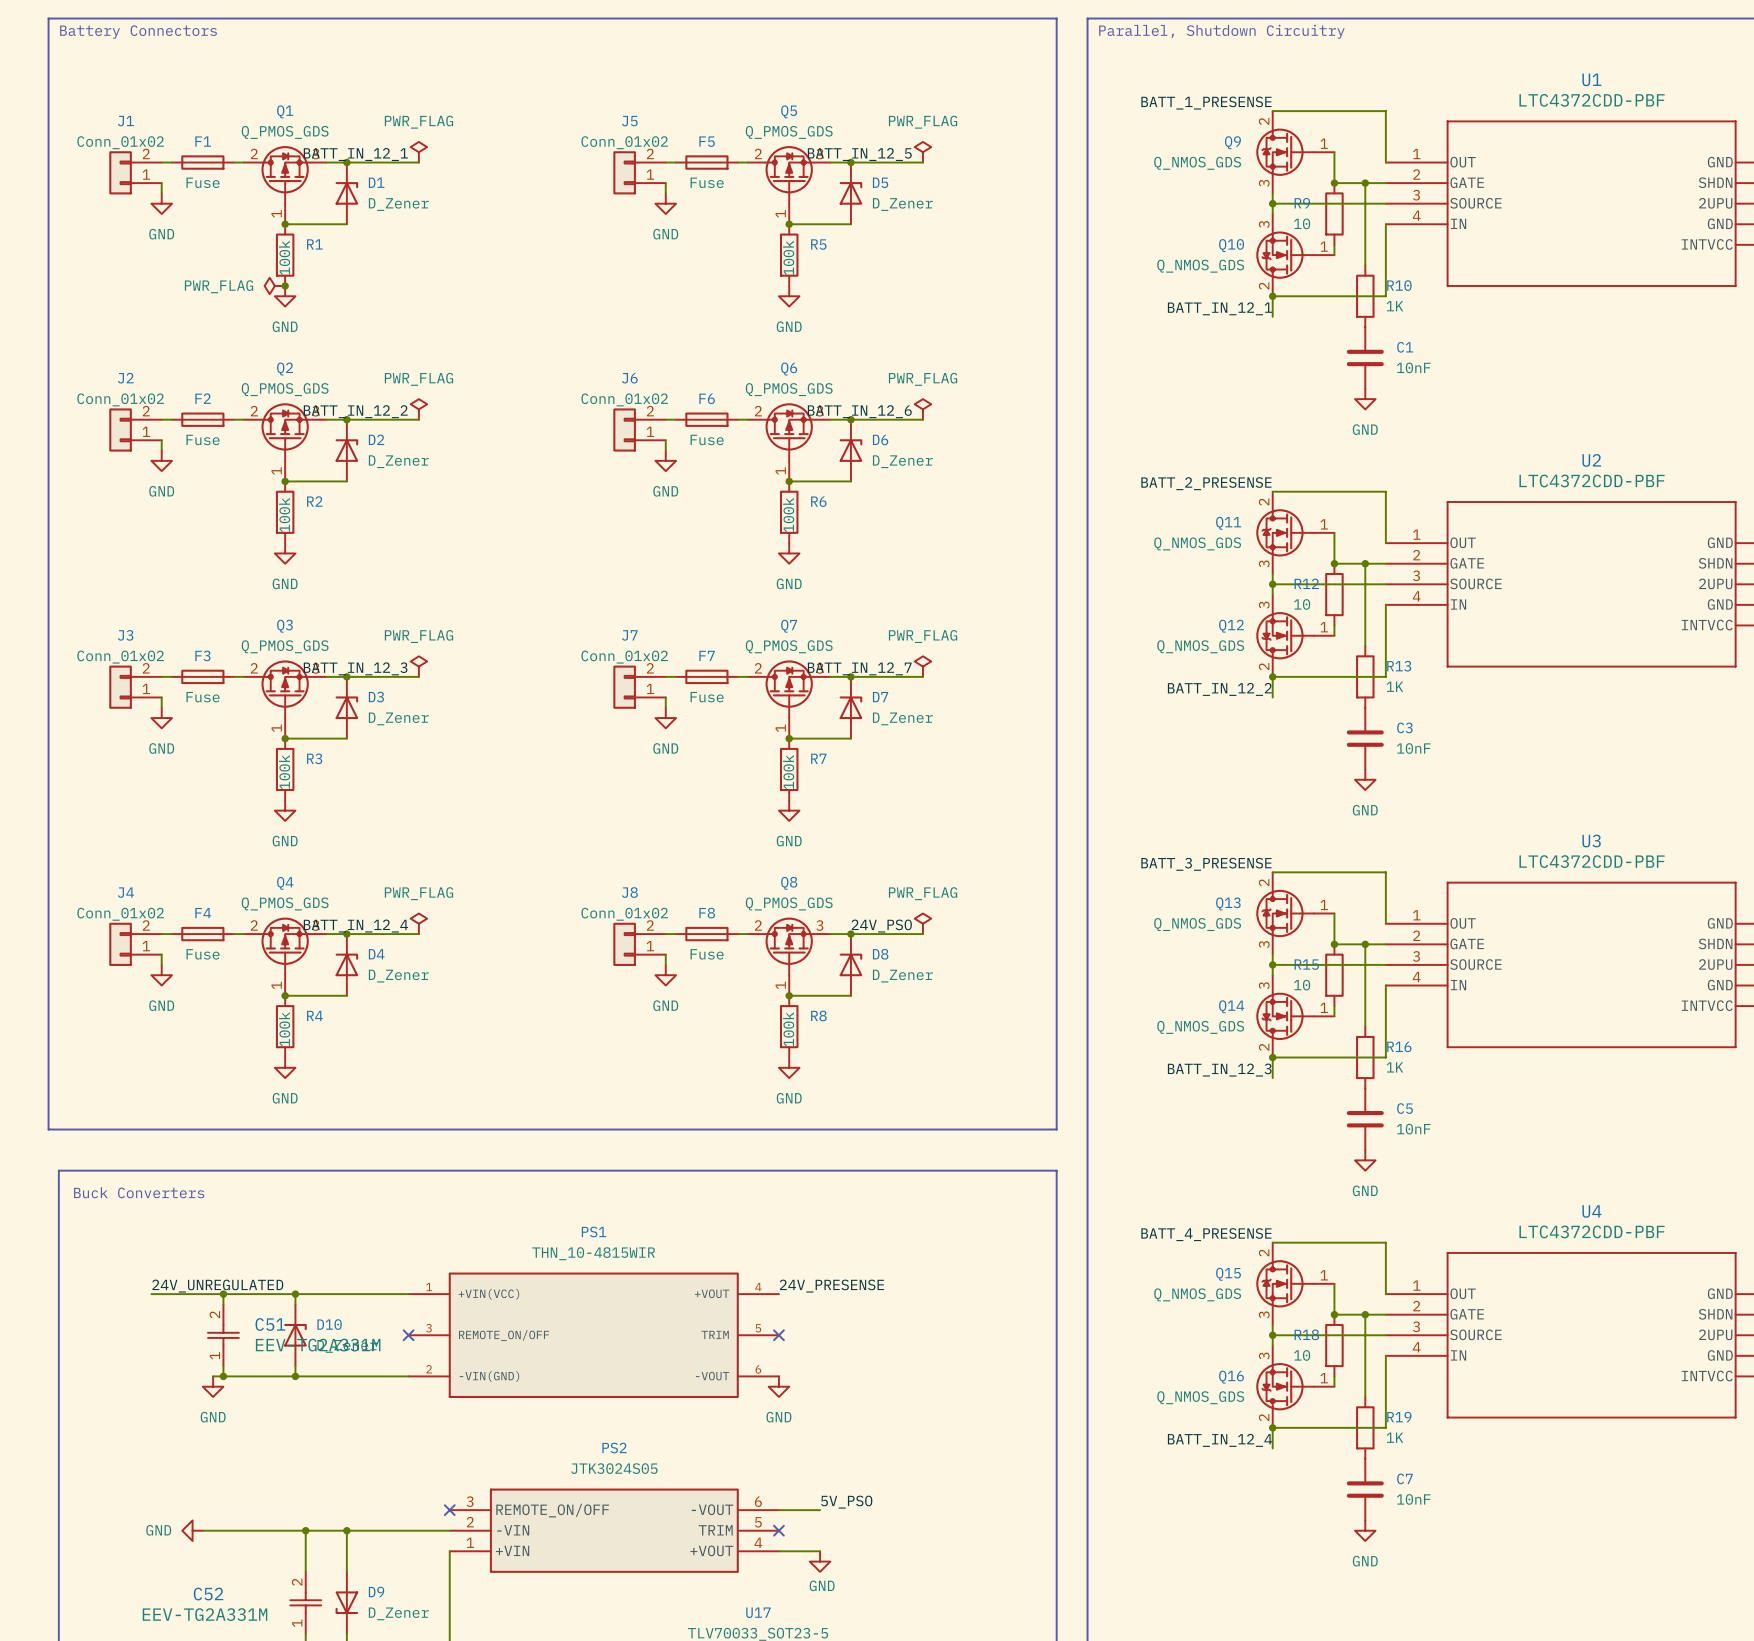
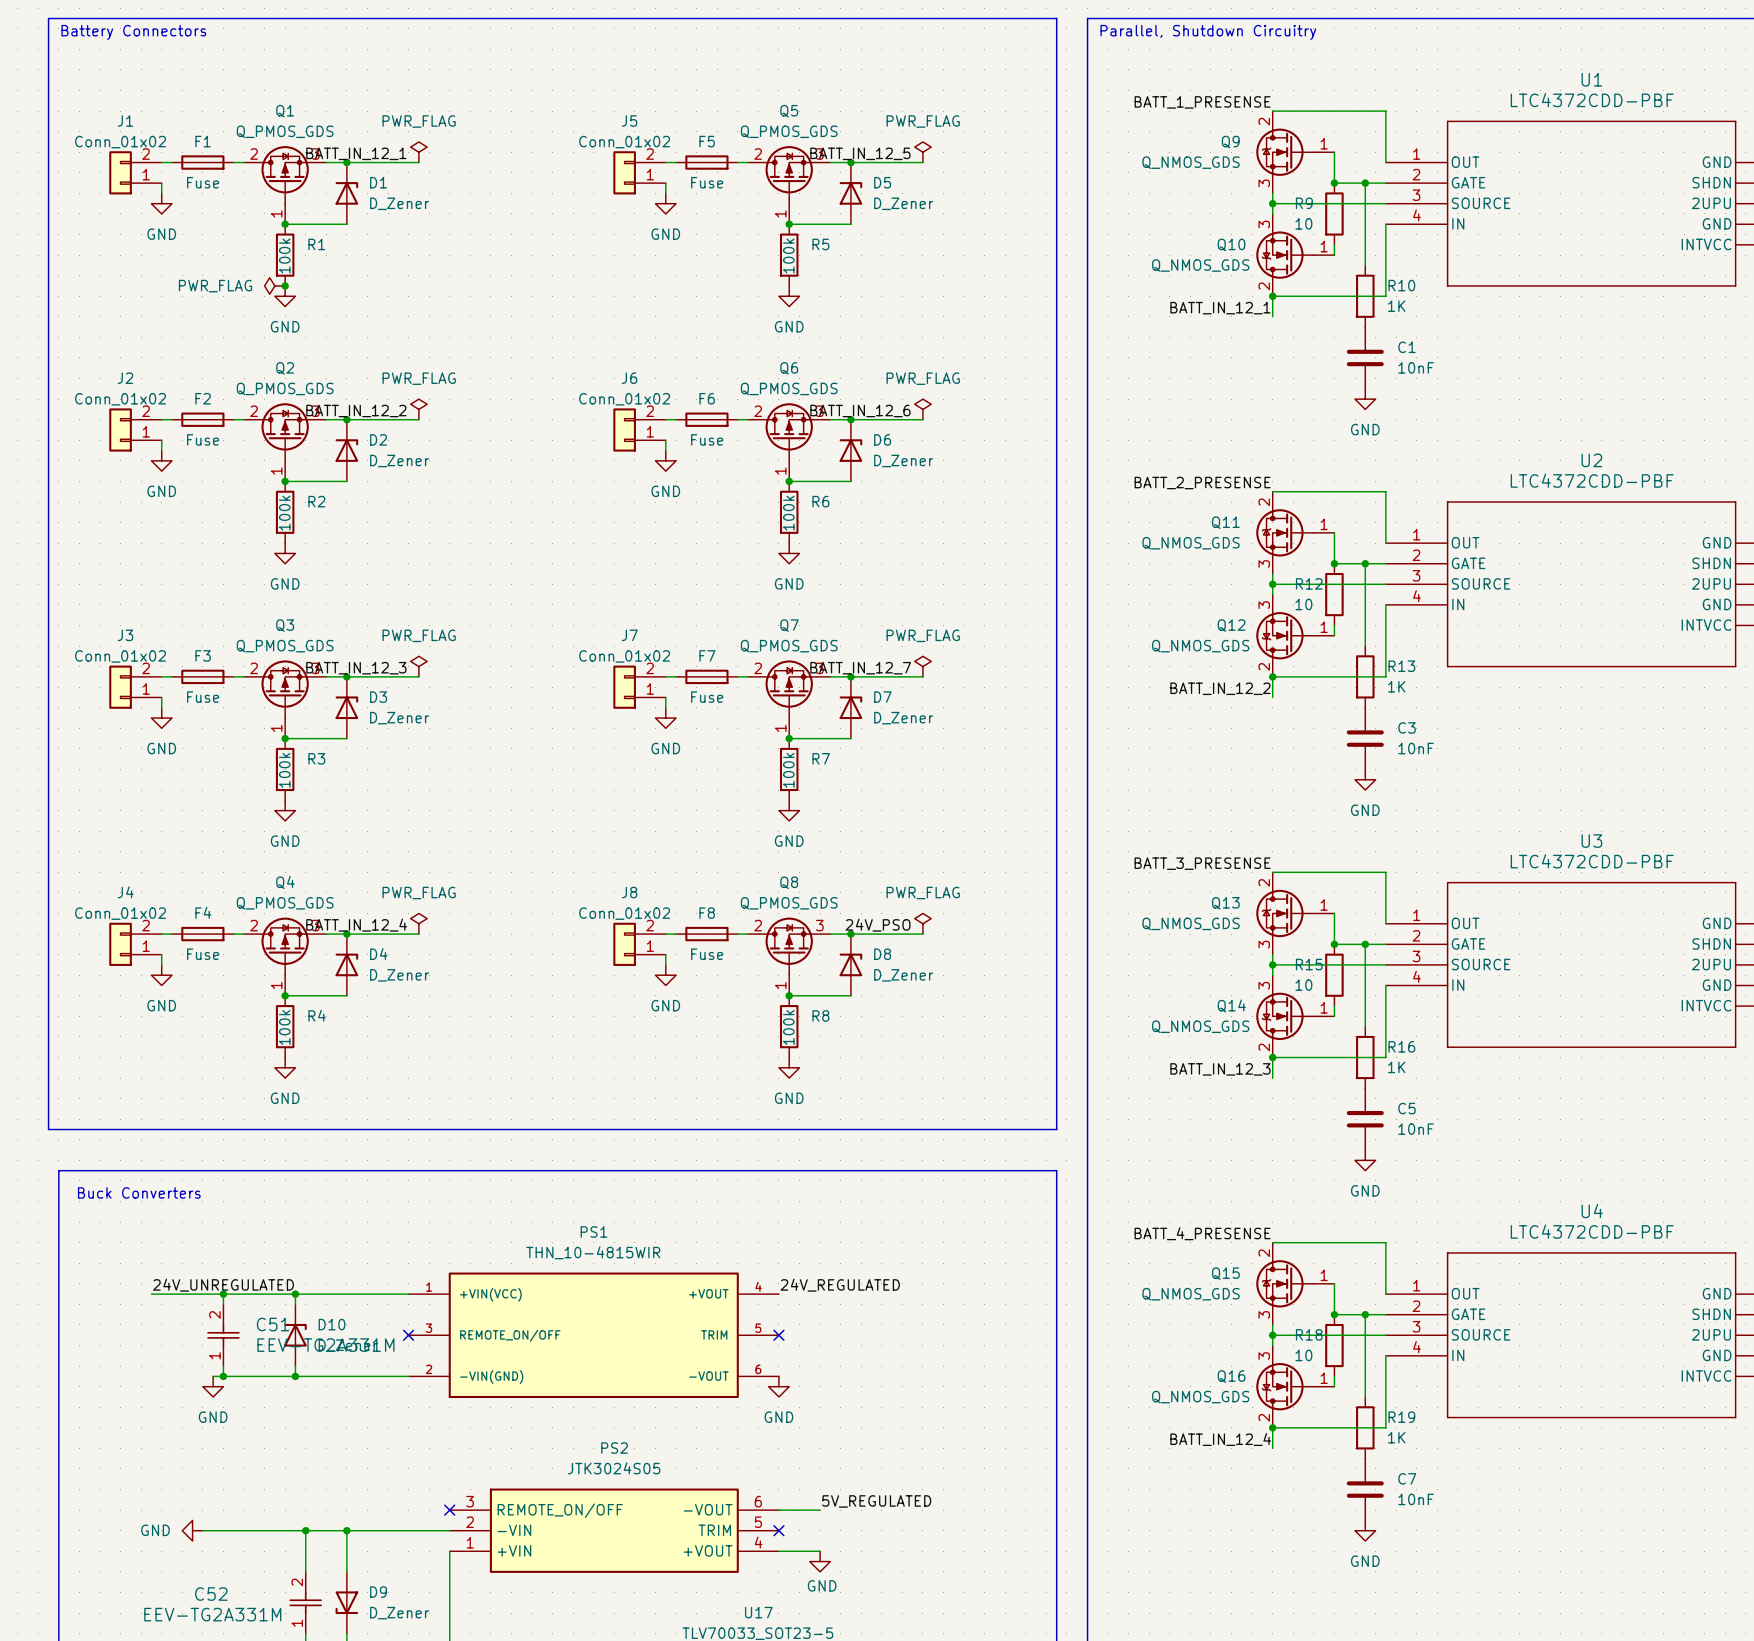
label: 24V_PRESENSE (831, 1286) -> 24V_REGULATED (840, 1285)
label: 5V_PSO (846, 1502) -> 5V_REGULATED (876, 1501)

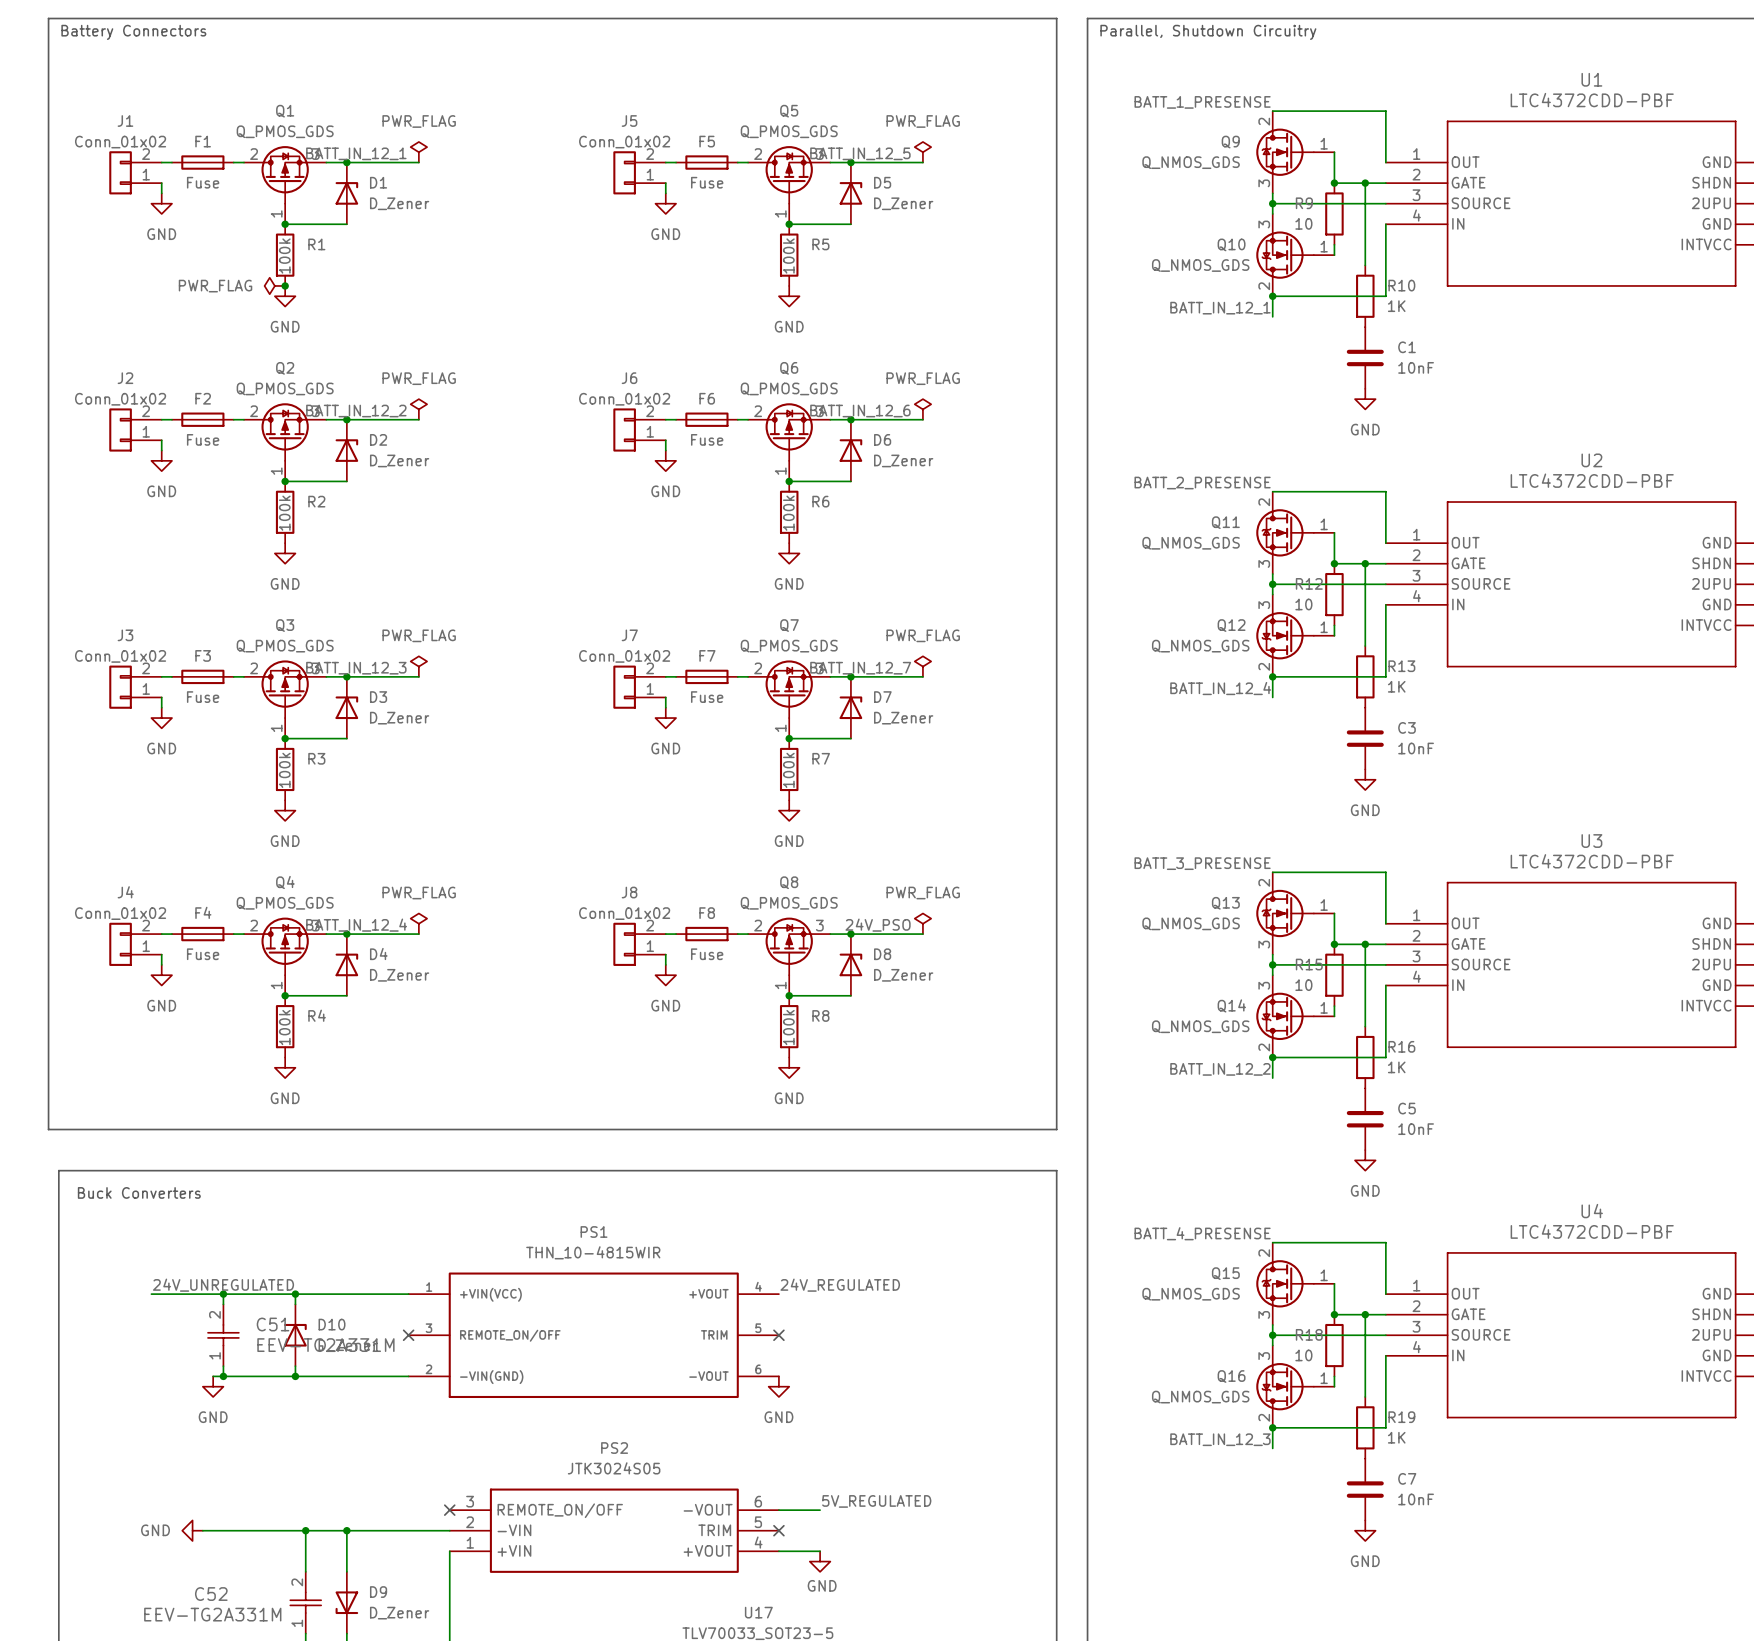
label: BATT_IN_12_2 (1220, 688) -> BATT_IN_12_4 (1220, 688)
label: BATT_IN_12_3 (1220, 1069) -> BATT_IN_12_2 (1220, 1069)
label: BATT_IN_12_4 (1220, 1439) -> BATT_IN_12_3 (1220, 1439)

